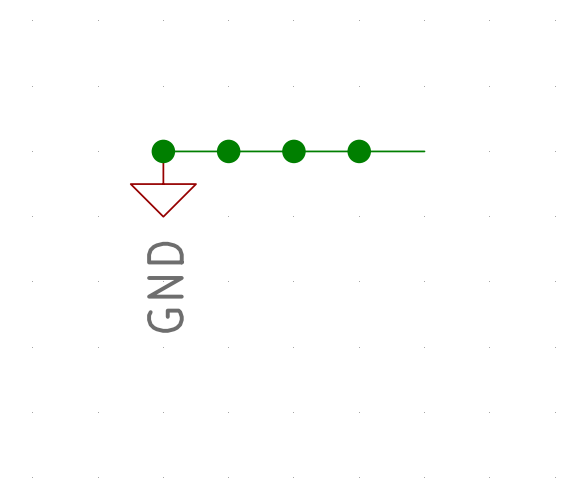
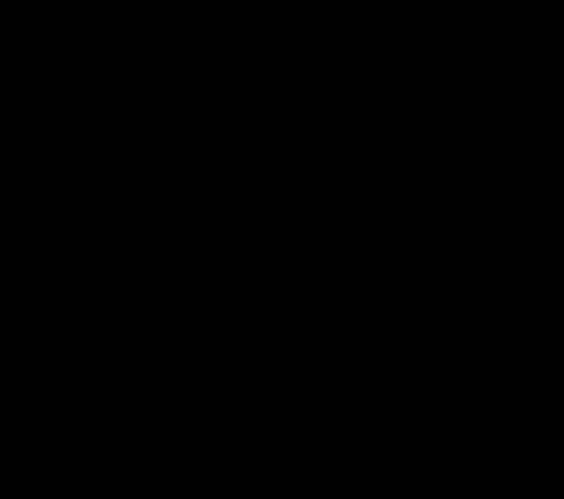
wire: (163, 151) (424, 151) -> none
junction: (163, 151) -> none
junction: (228, 151) -> none
junction: (293, 151) -> none
junction: (359, 151) -> none
power symbol: GND (163, 184) -> none

